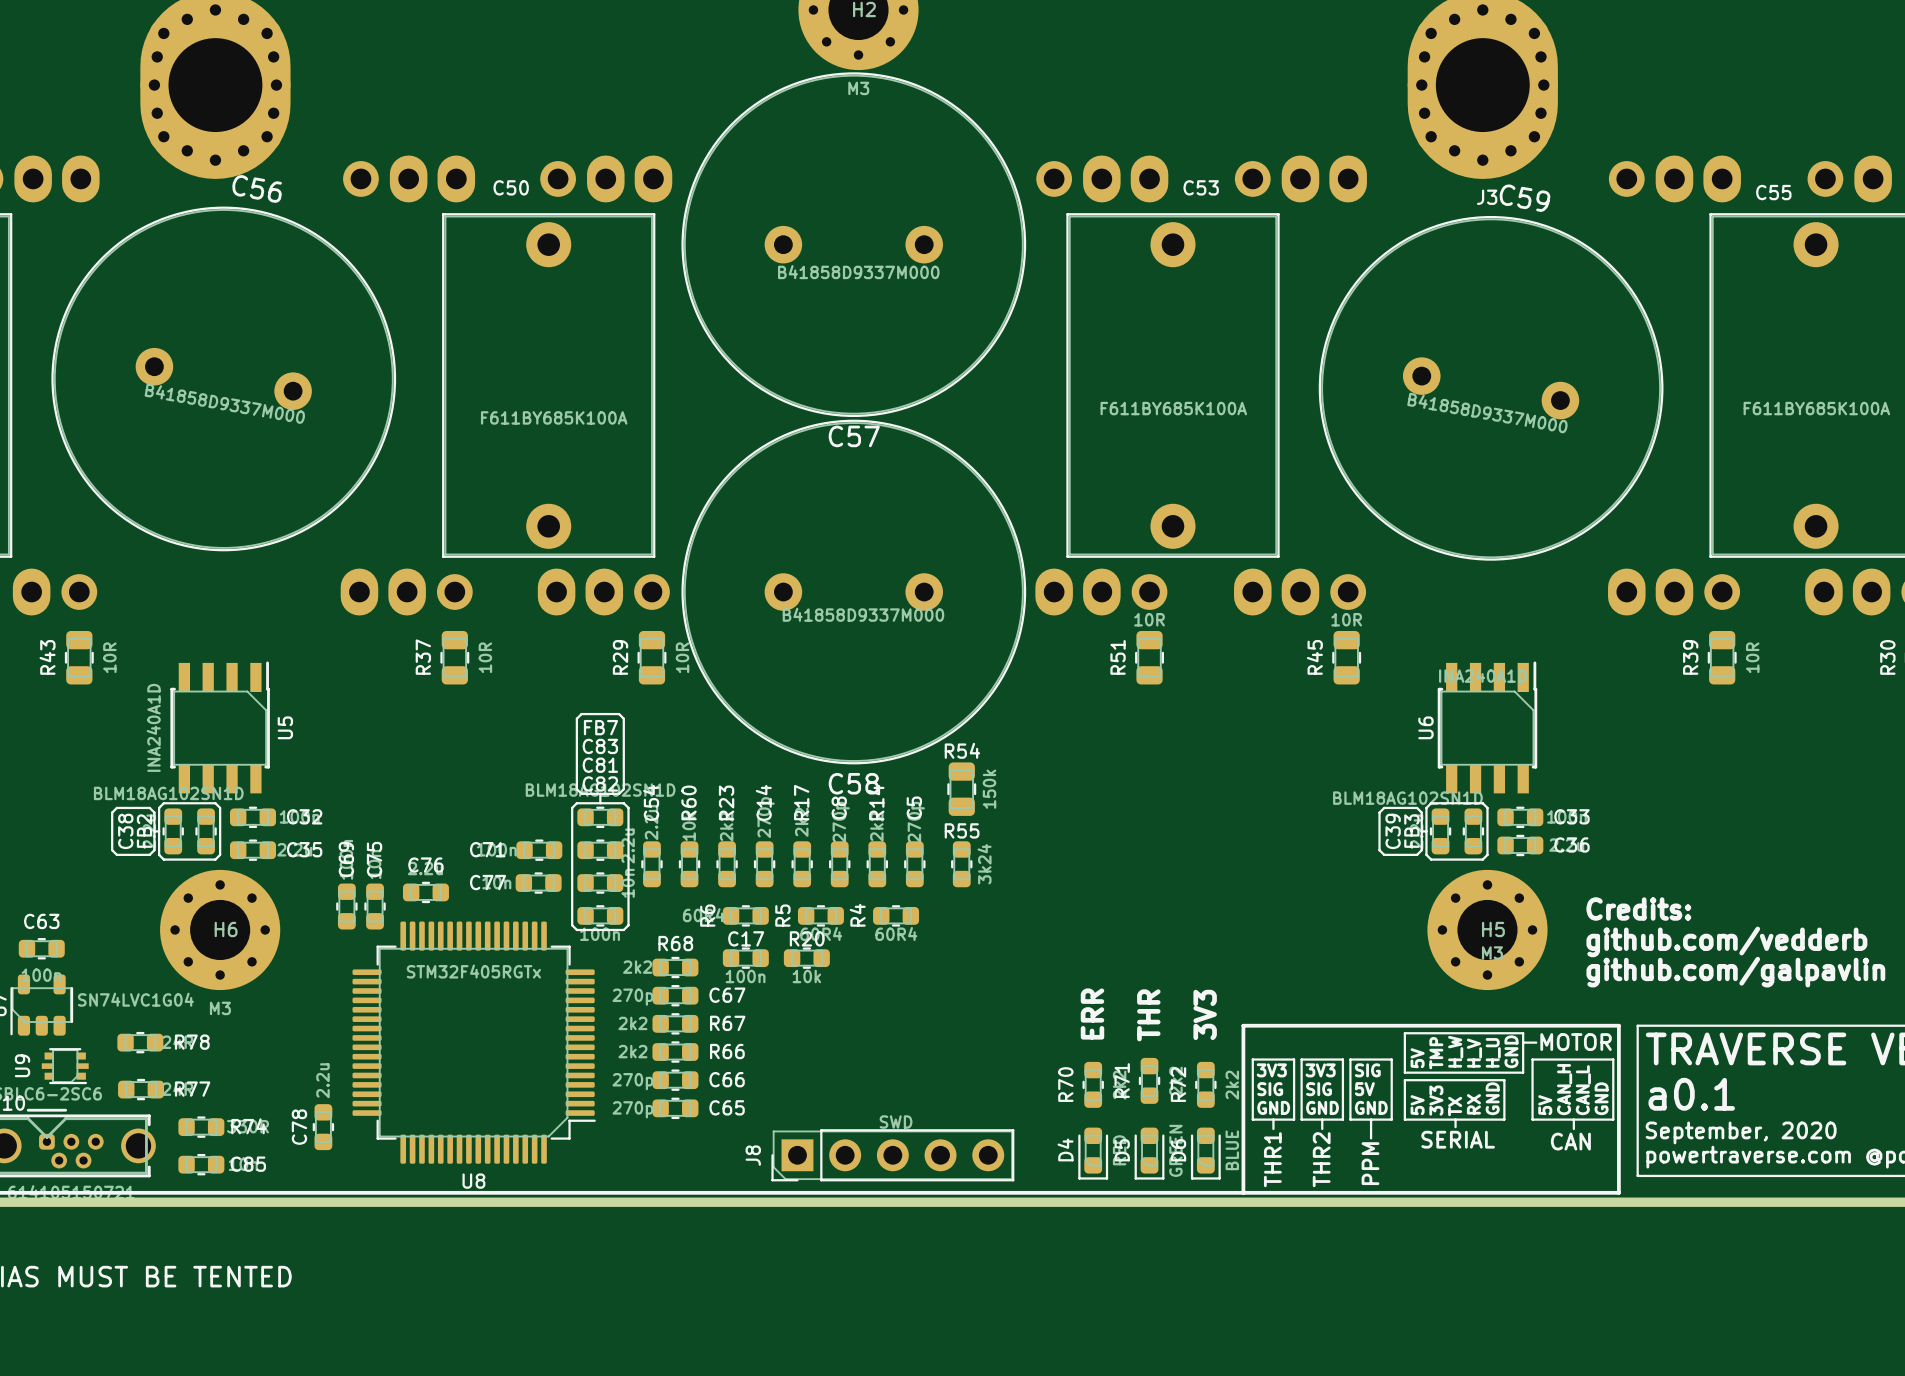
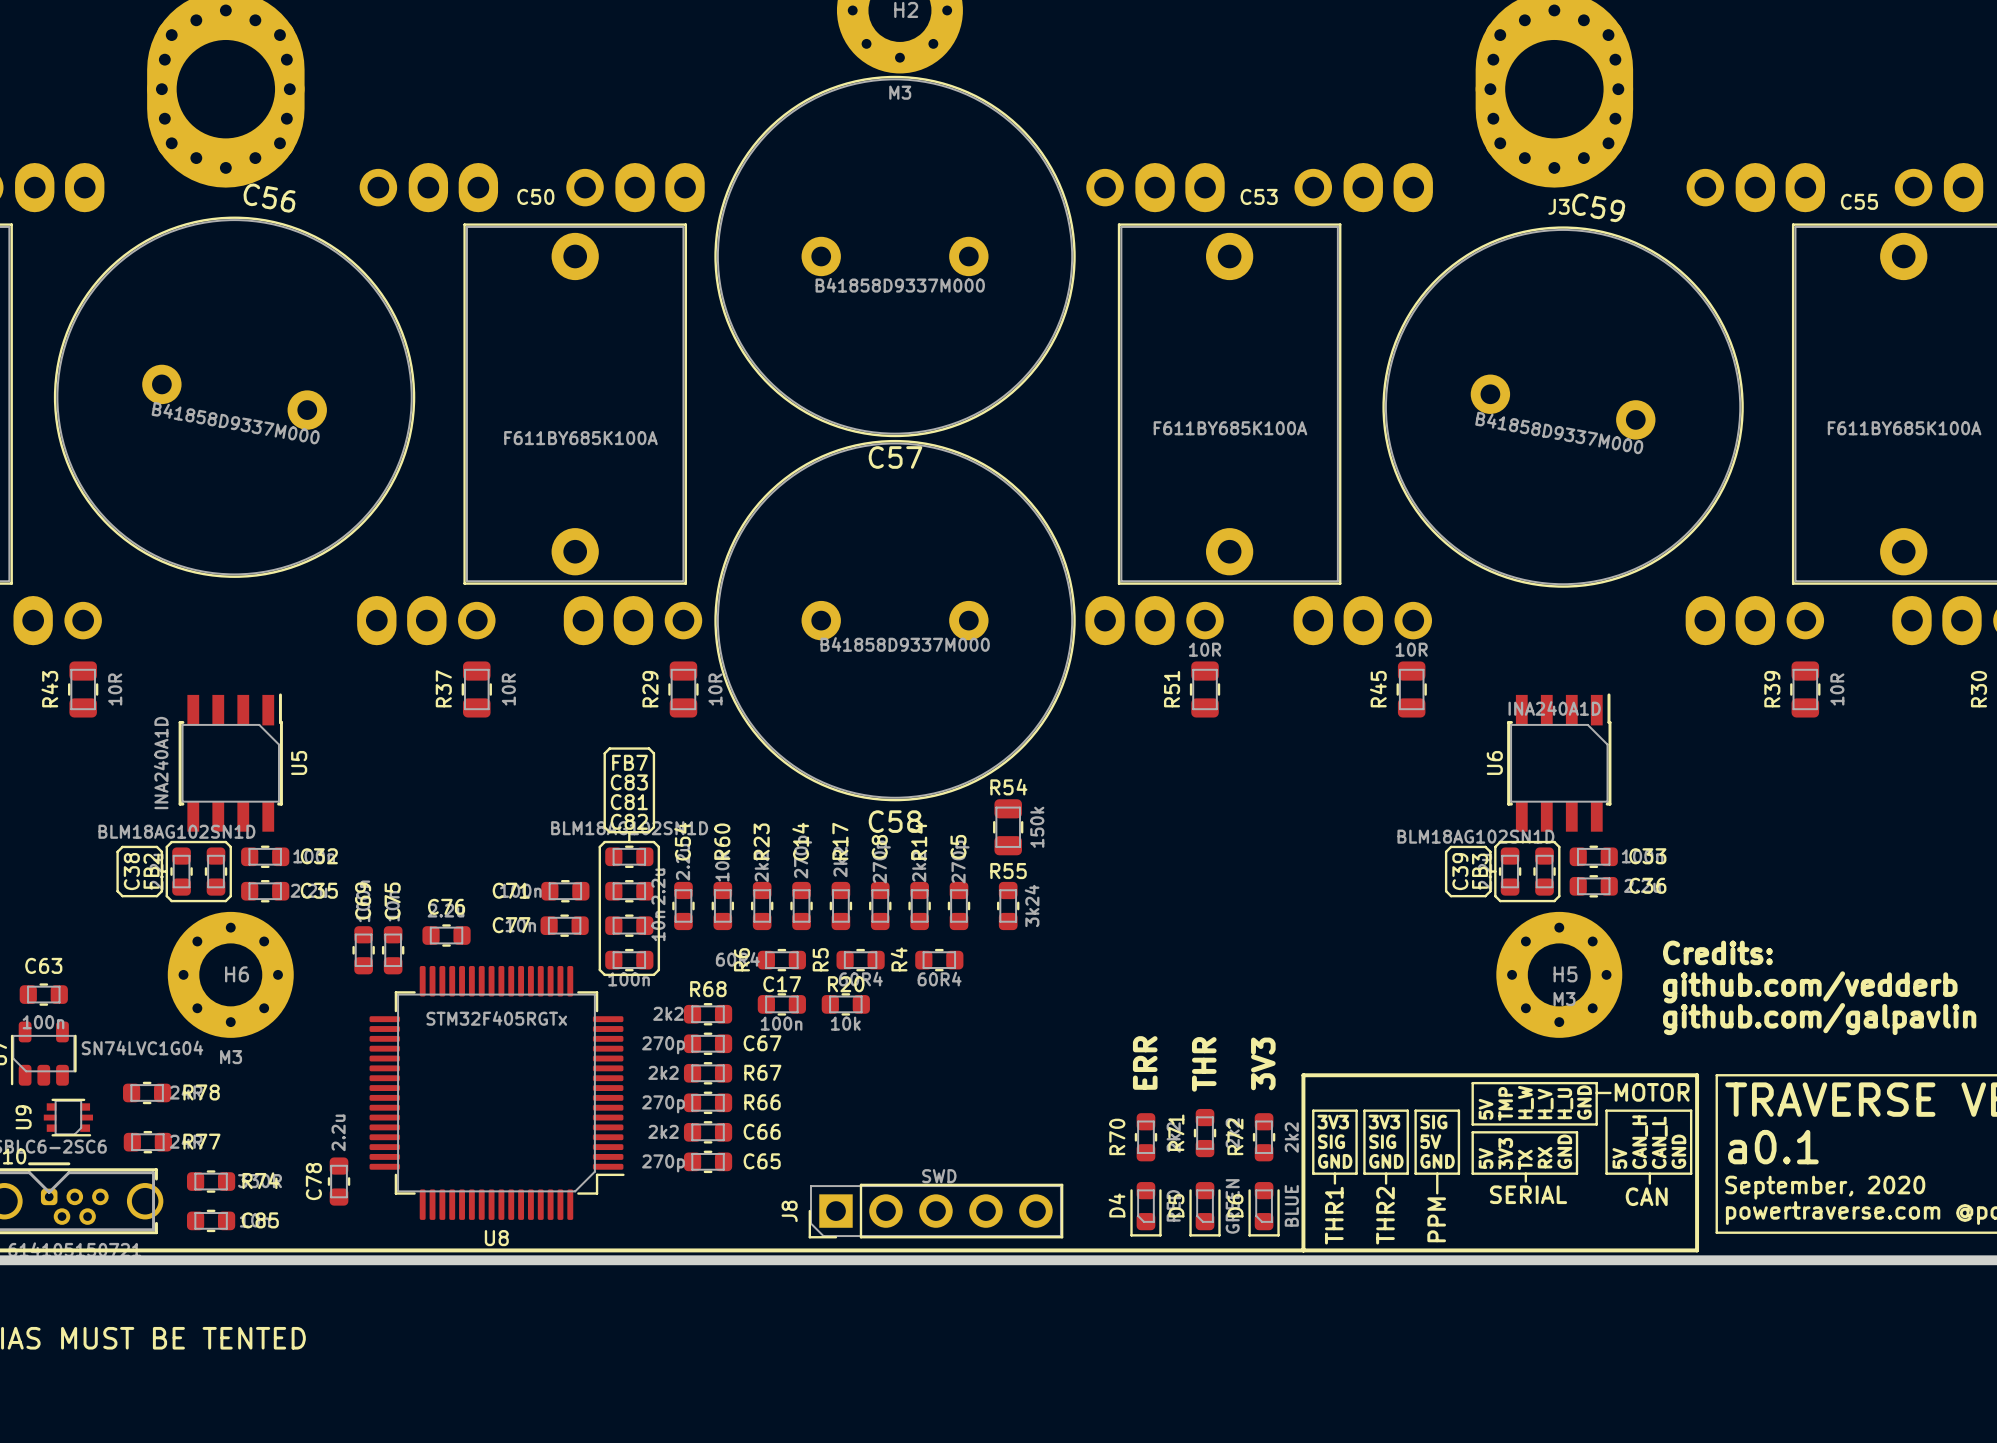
R66 value: 2k2 (632, 1051) -> 270p (663, 1104)
C66 value: 270p (632, 1081) -> 2k2 (663, 1131)

